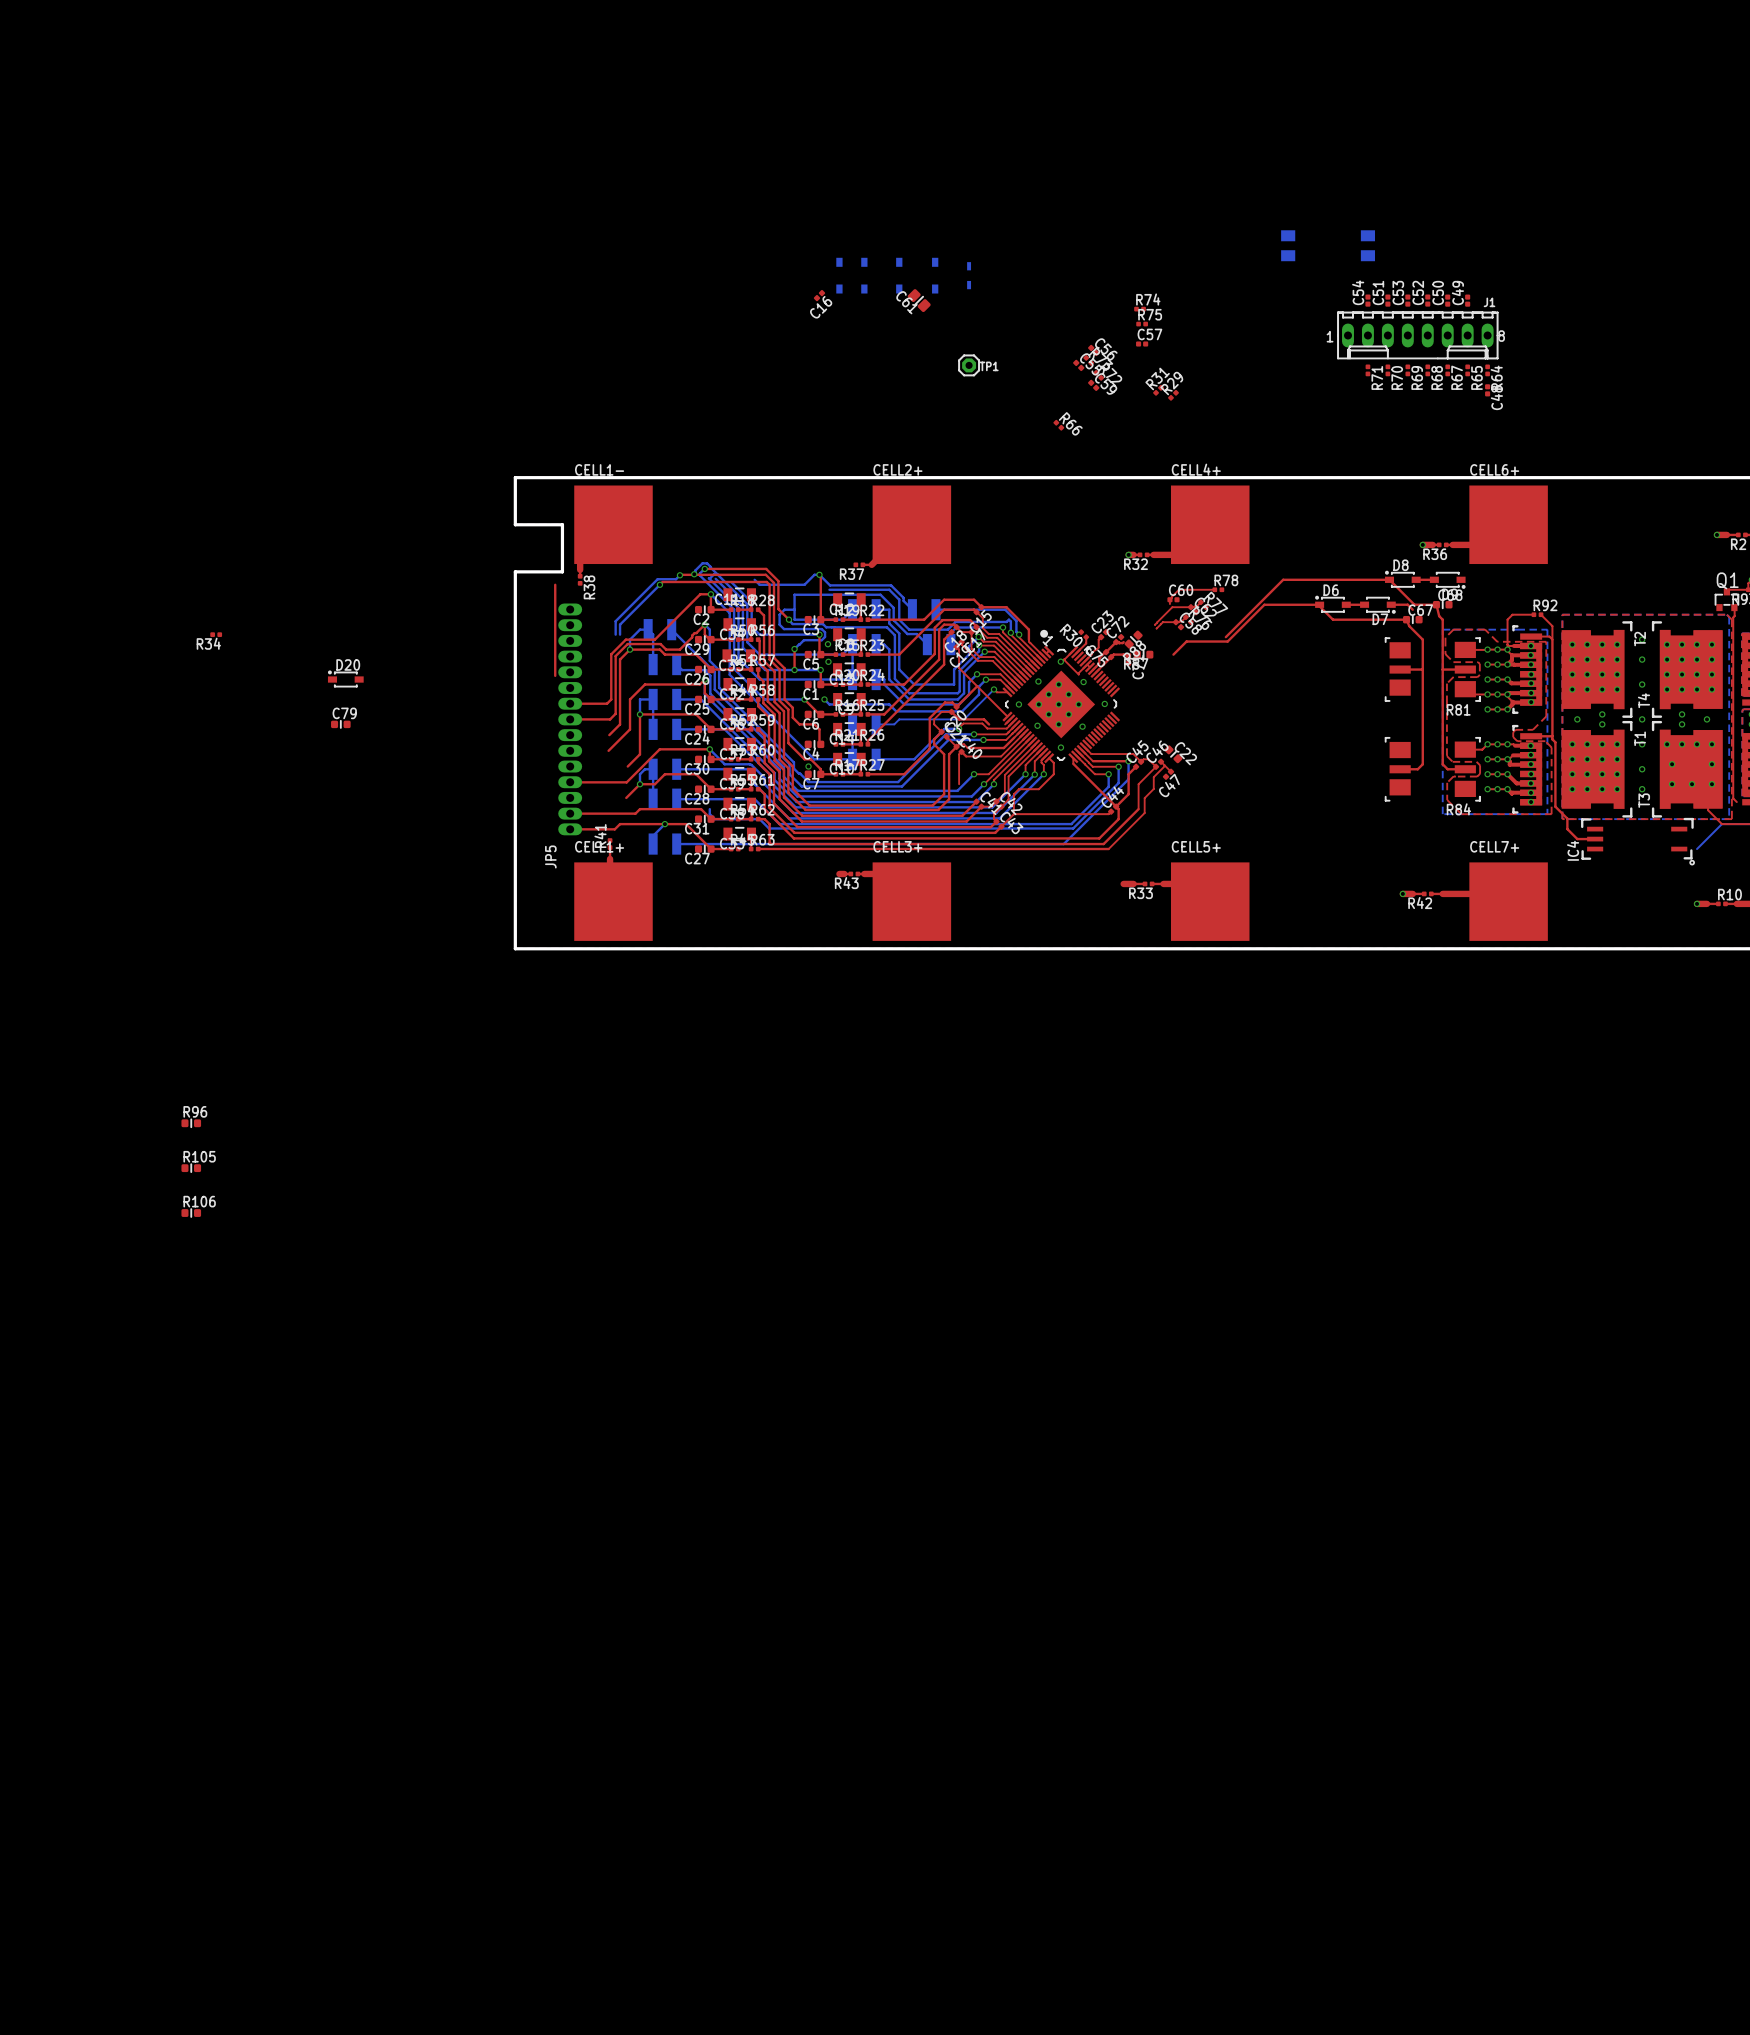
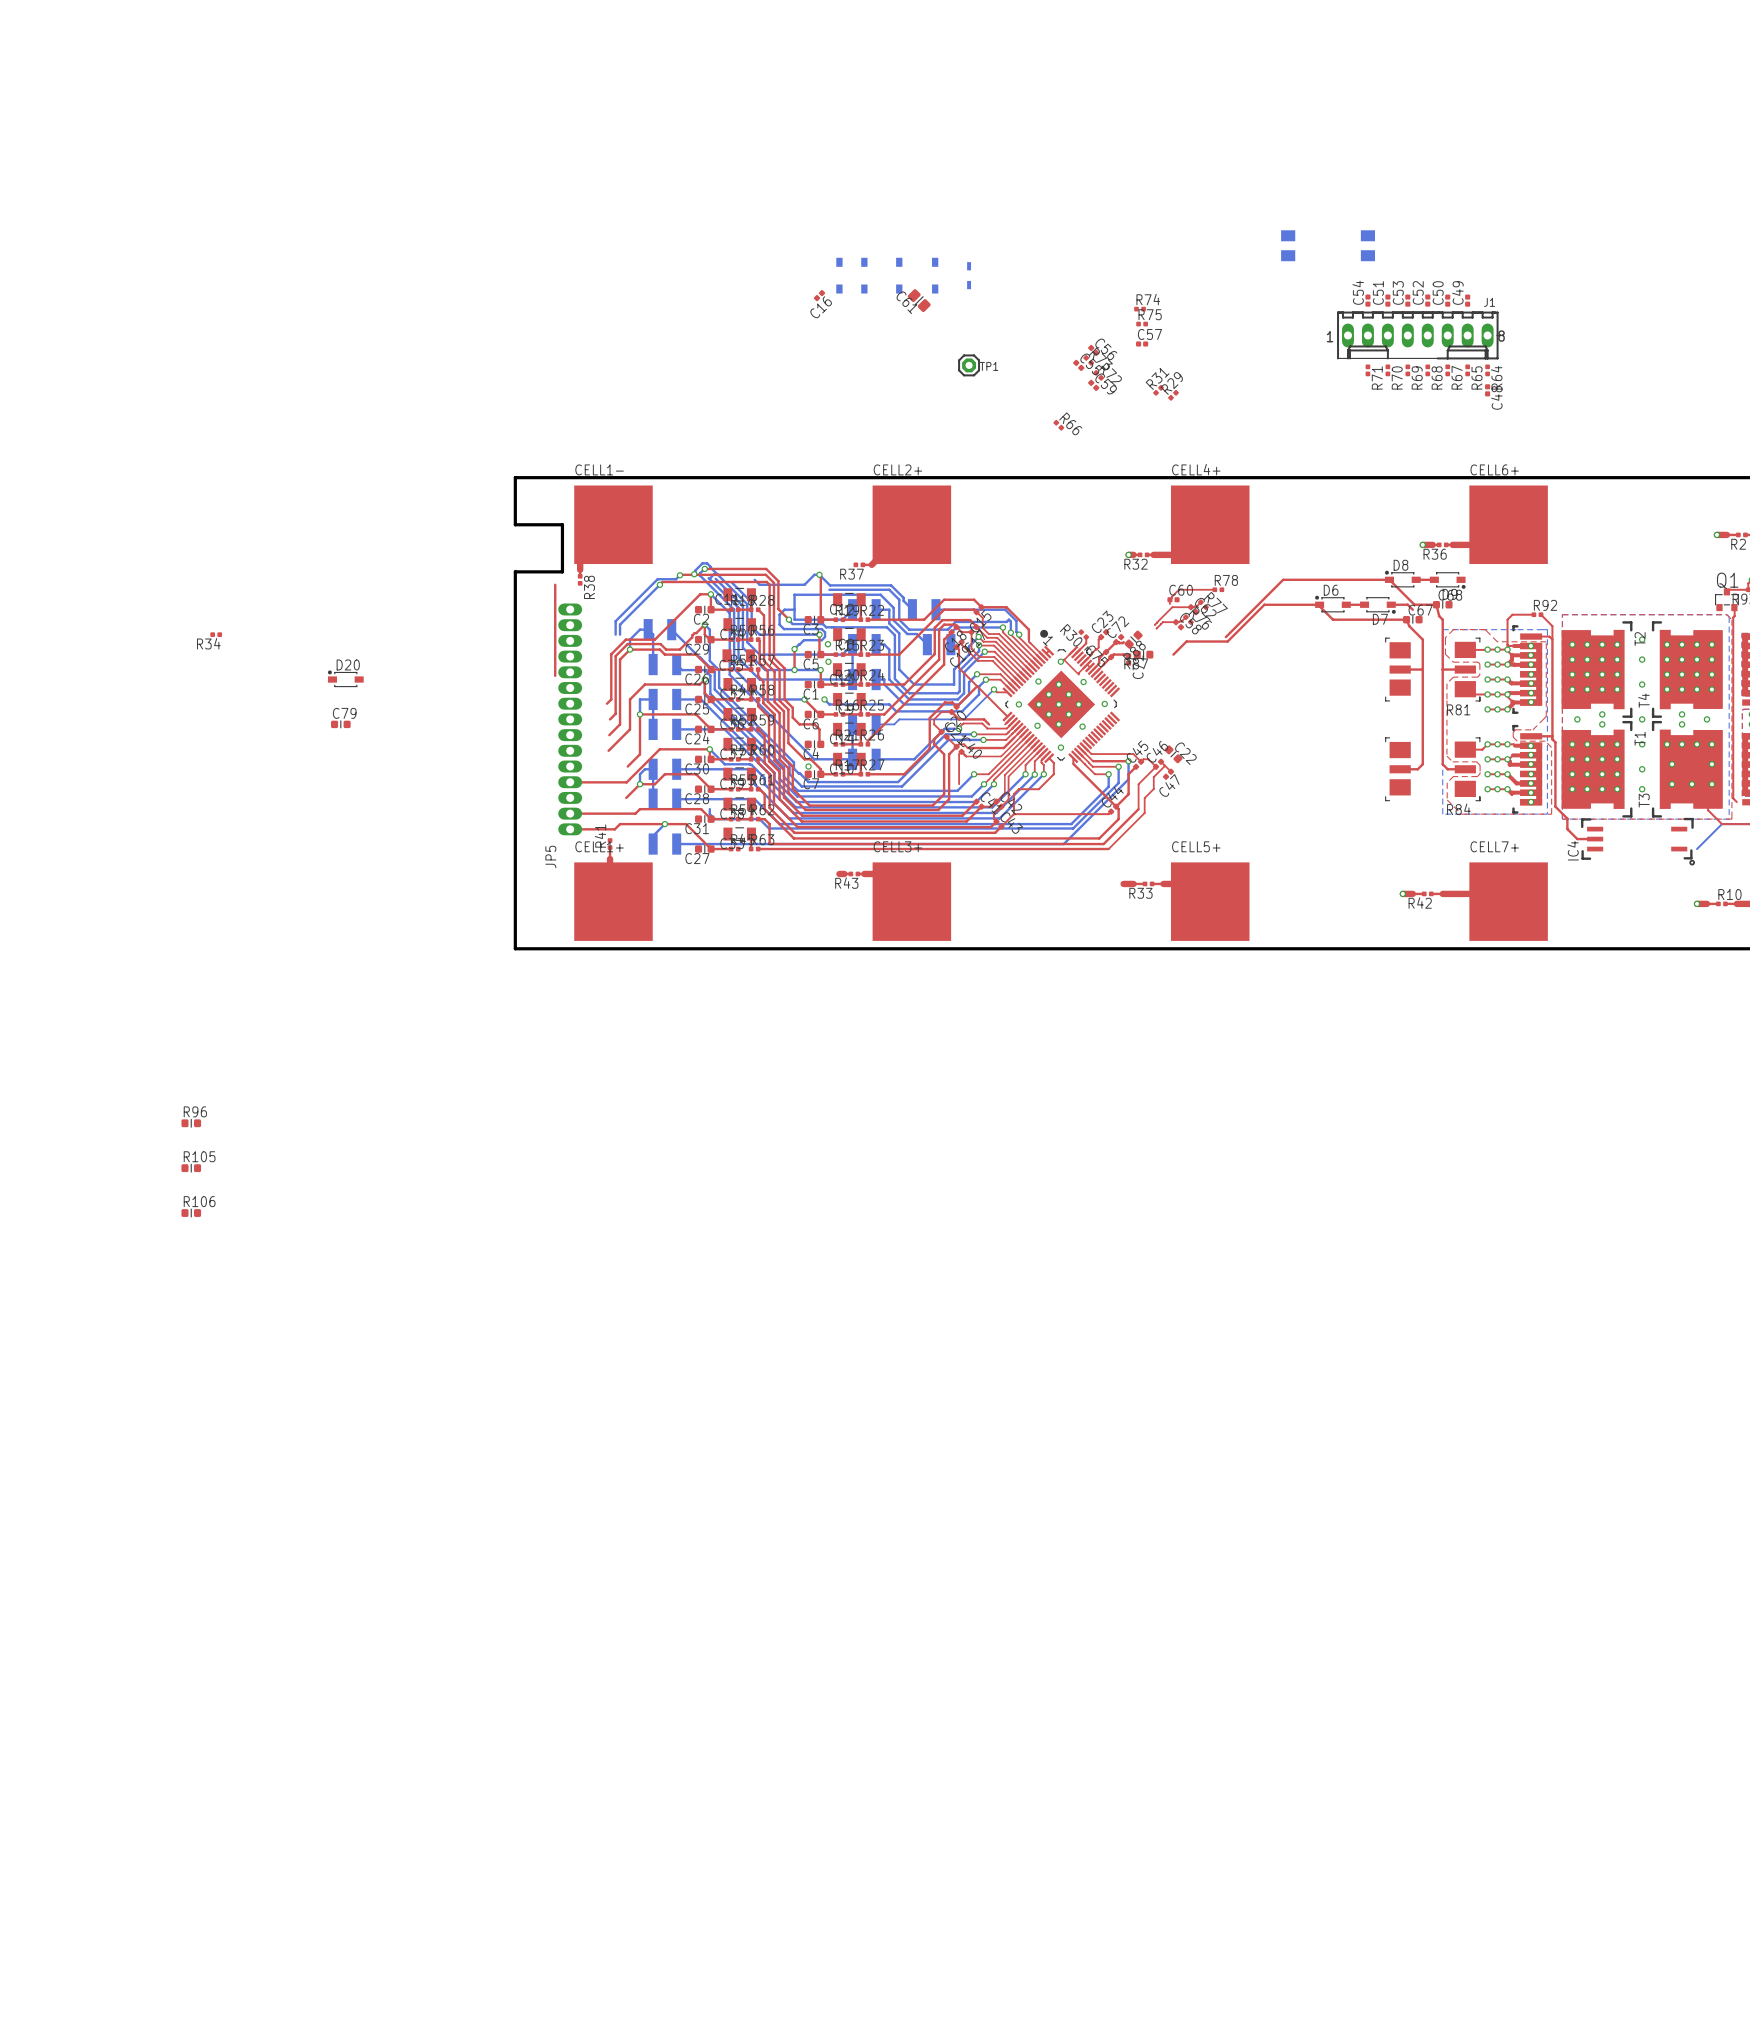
top track: (570, 703) (607, 703) -> none
top track: (570, 719) (610, 719) -> none

